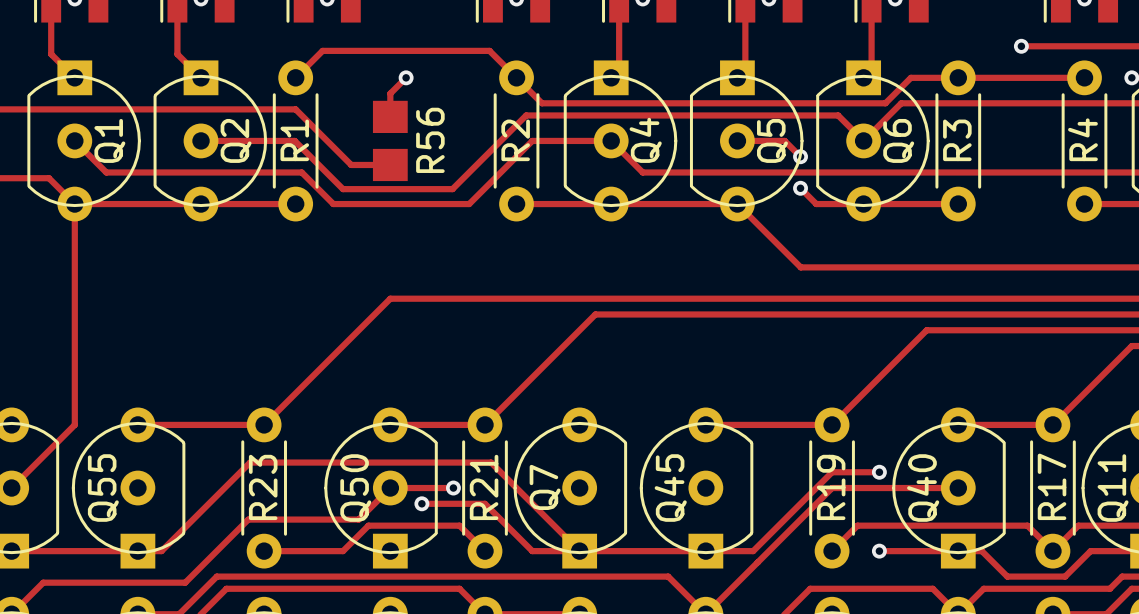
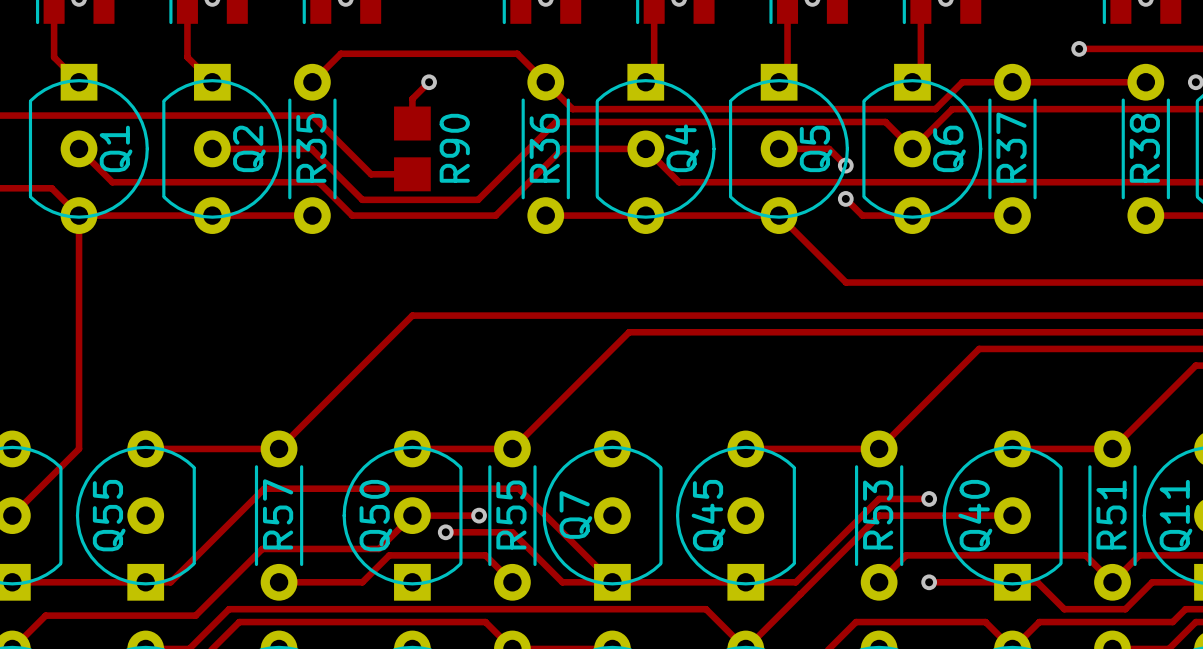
R4 name: R4 (1082, 139) -> R38 (1144, 148)
R1 name: R1 (294, 140) -> R35 (311, 148)
R56 name: R56 (430, 140) -> R90 (454, 148)
R2 name: R2 (515, 140) -> R36 (544, 148)
R3 name: R3 (957, 140) -> R37 (1011, 147)
R17 name: R17 (1052, 486) -> R51 (1111, 515)
R23 name: R23 (263, 487) -> R57 (278, 514)
R21 name: R21 (484, 487) -> R55 (511, 515)
R19 name: R19 (831, 487) -> R53 (878, 515)

